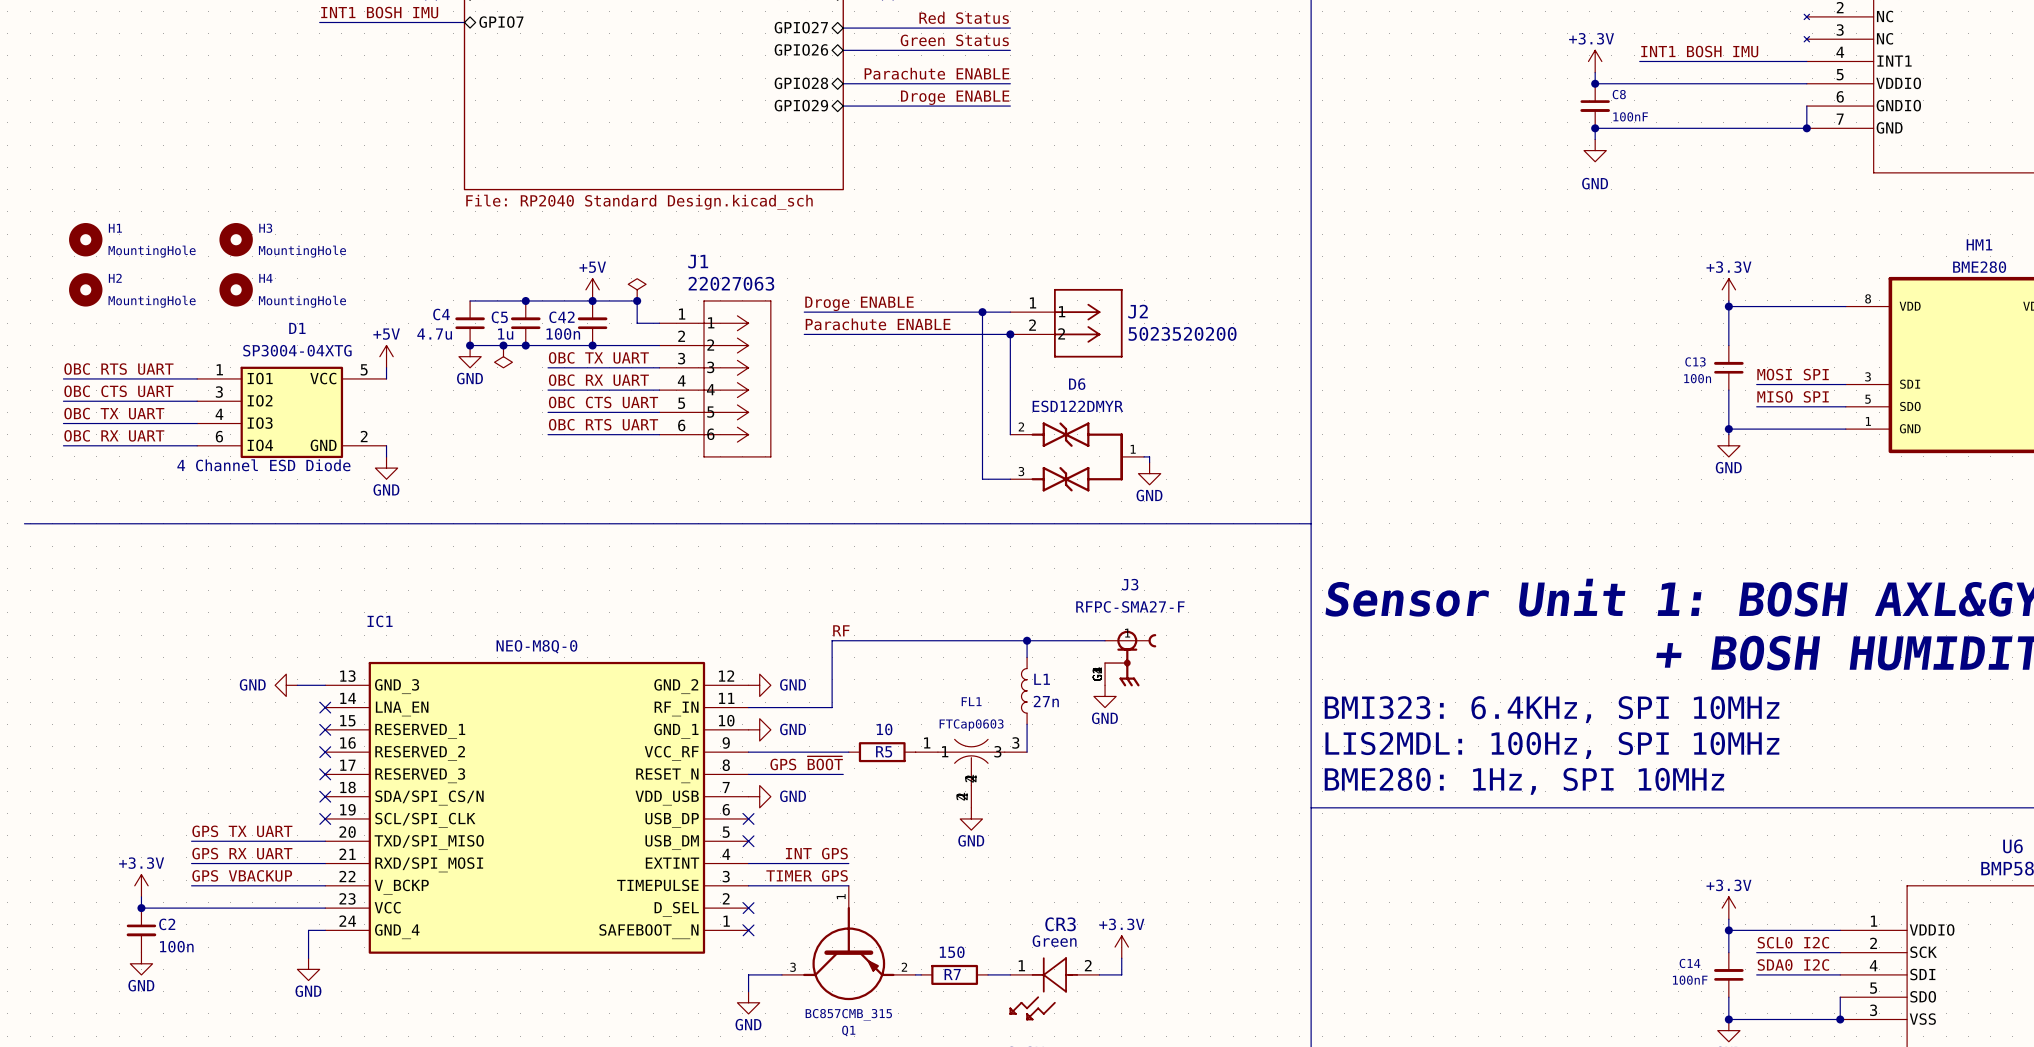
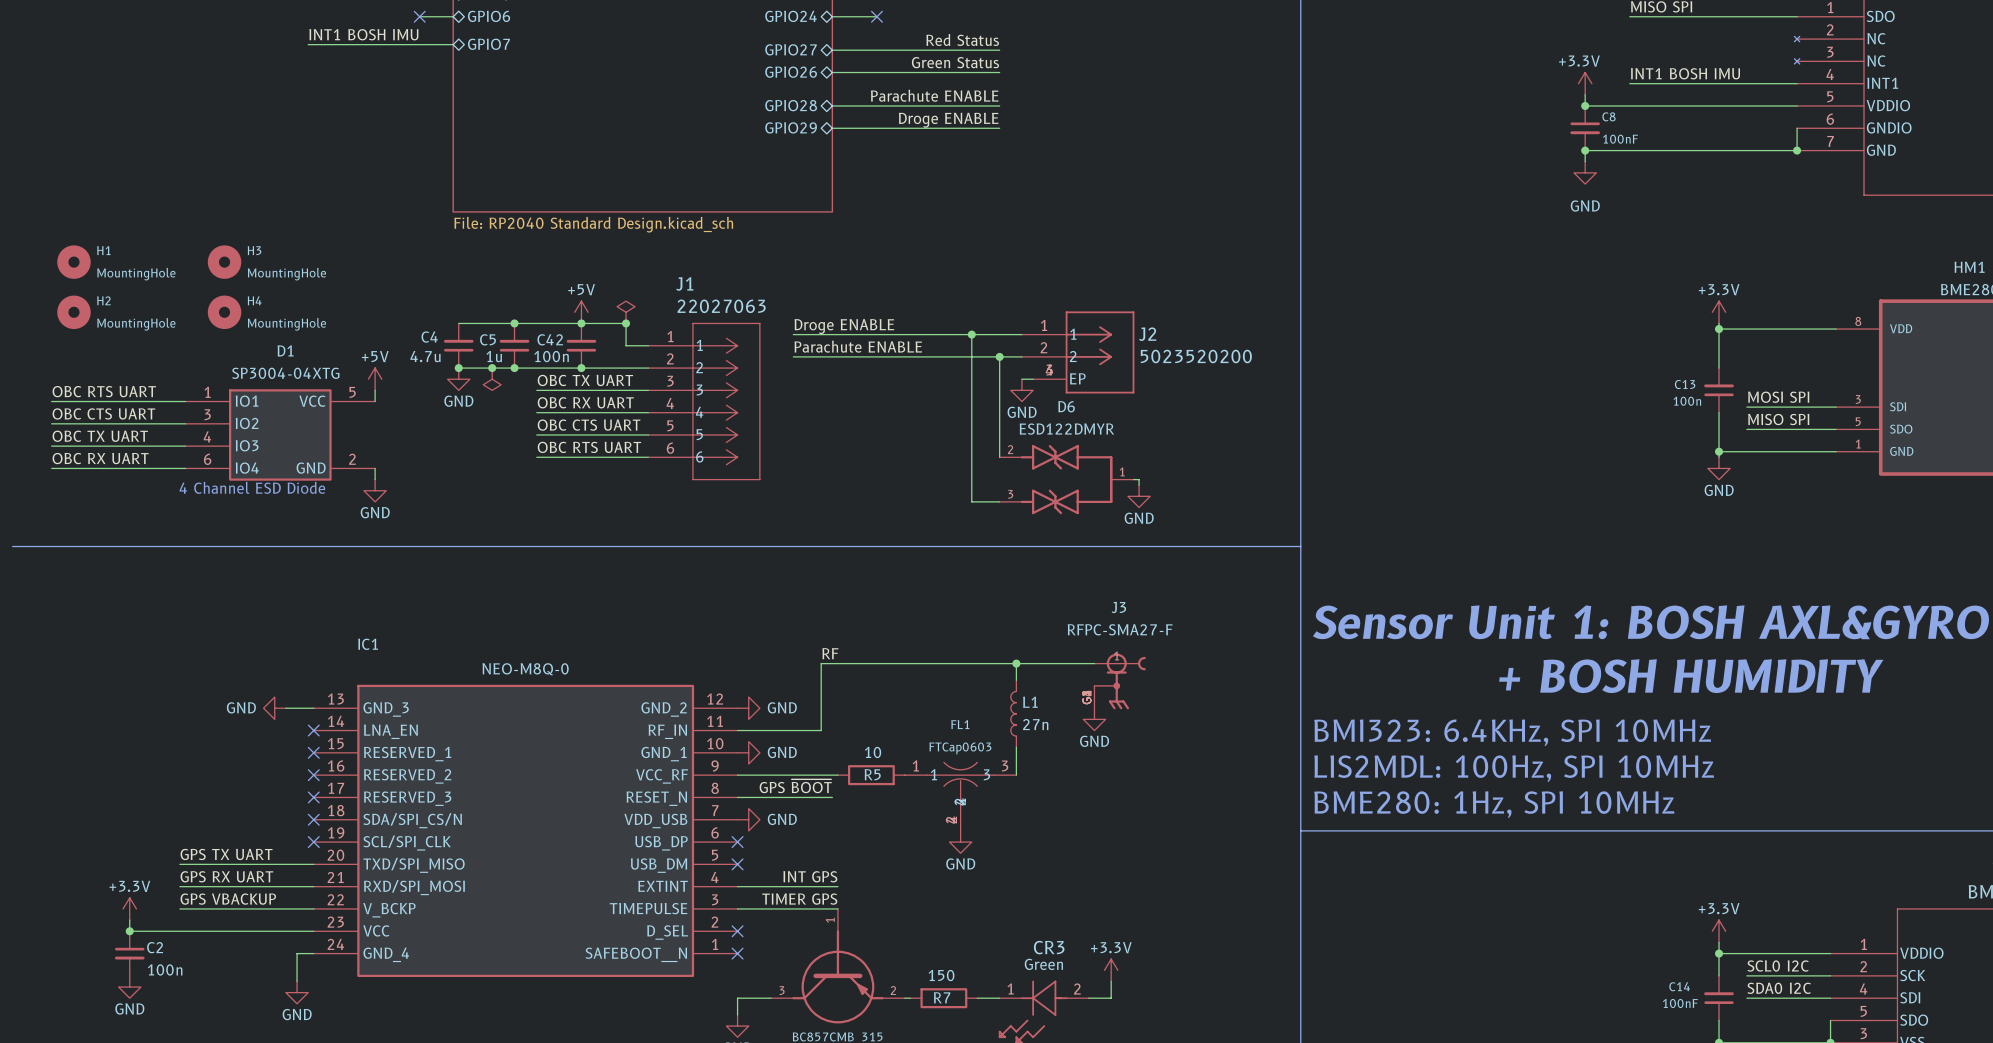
J2 symbol: [1010, 288, 1123, 358] -> [1021, 311, 1135, 394]
wire: none -> (1021, 379) (1033, 379)
power symbol: none -> GND (1021, 390)

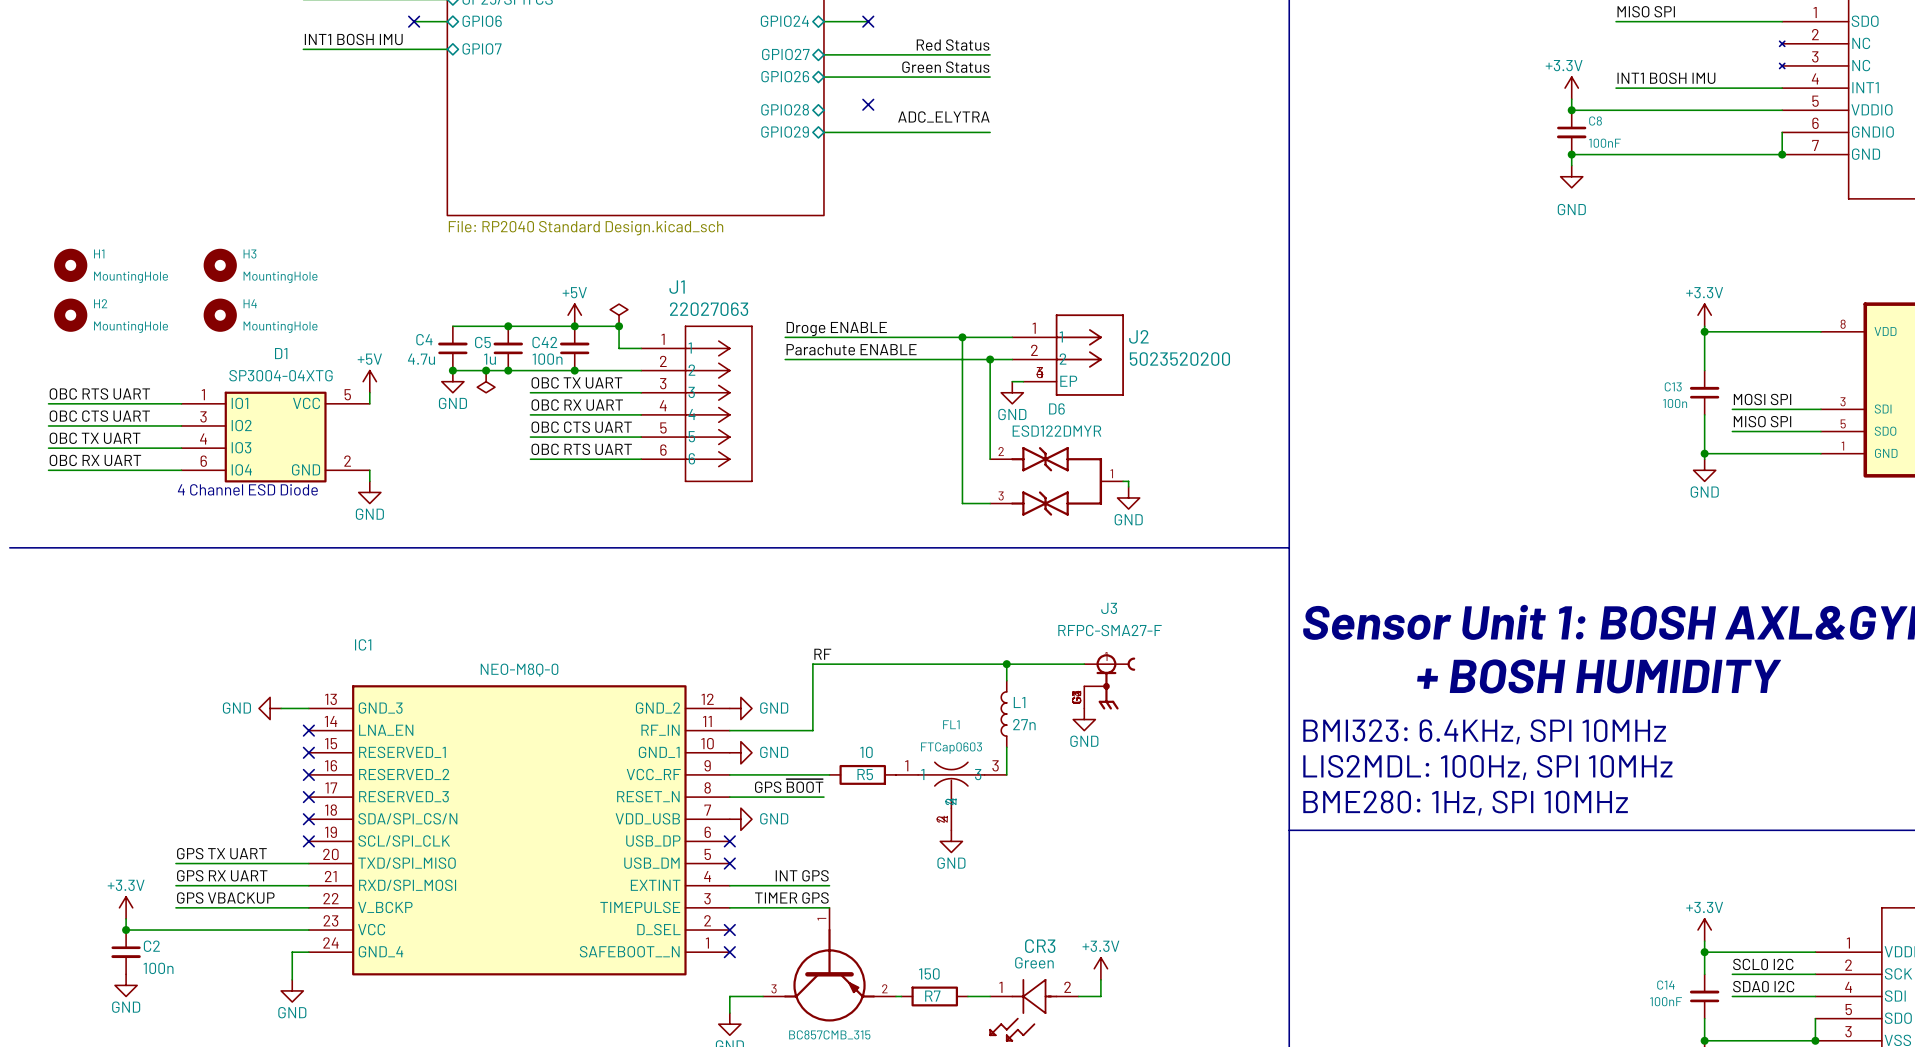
label: Parachute ENABLE (934, 95) -> none
no-connect mark: none -> (868, 104)
wire: (832, 105) (999, 105) -> none
label: Droge ENABLE (948, 120) -> ADC_ELYTRA (943, 117)

